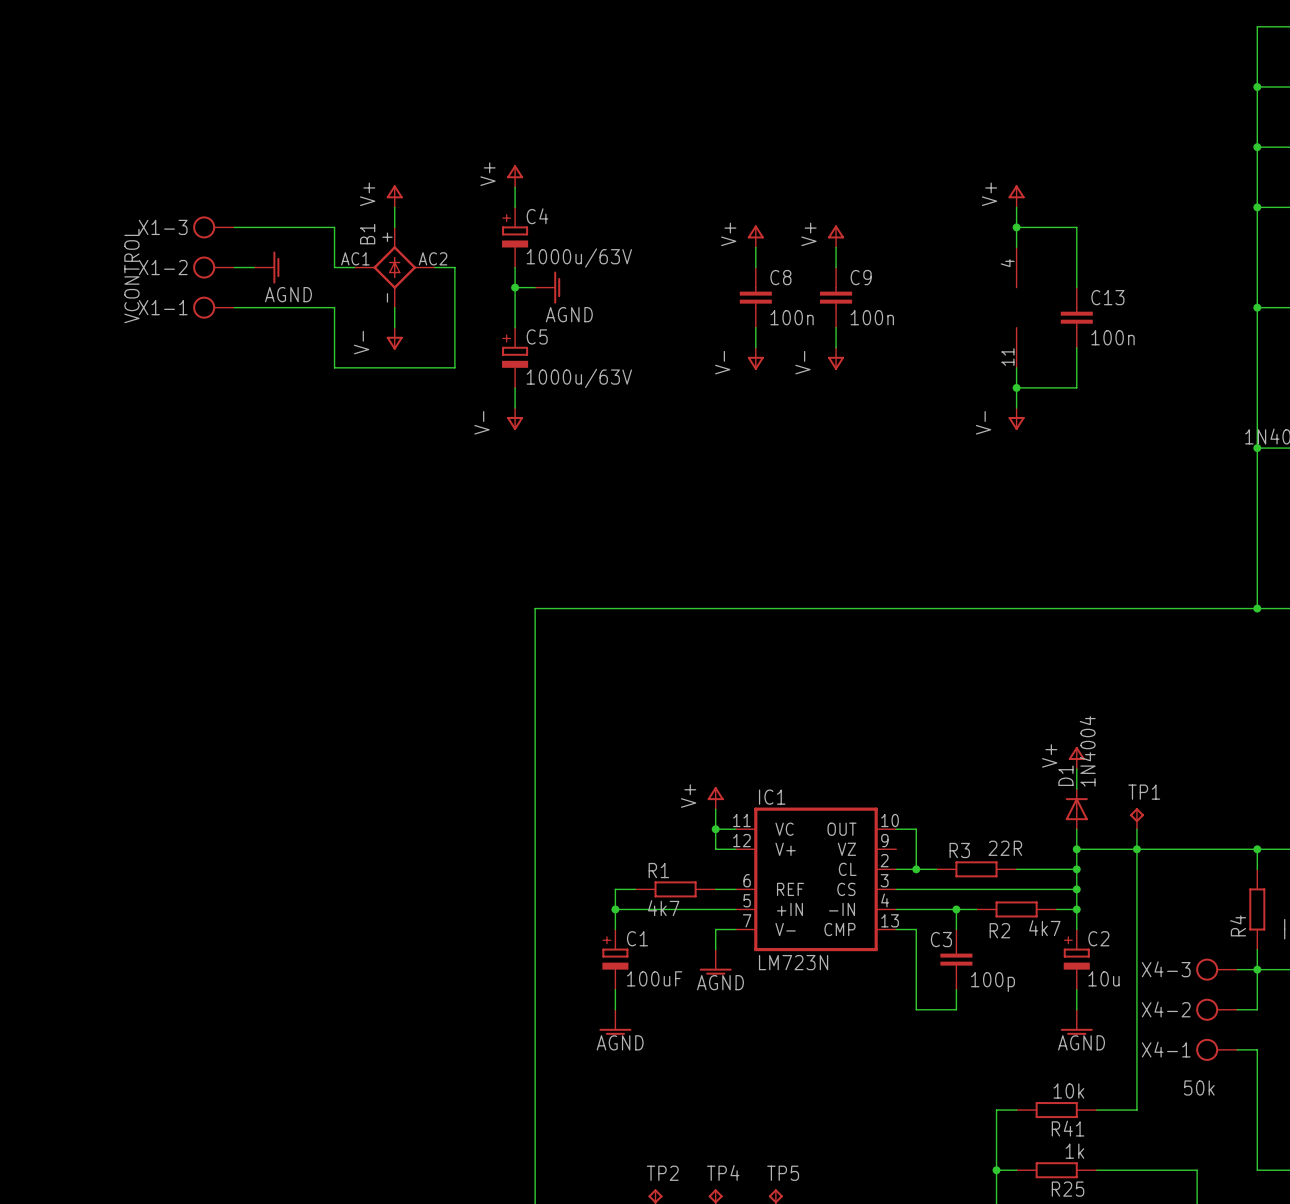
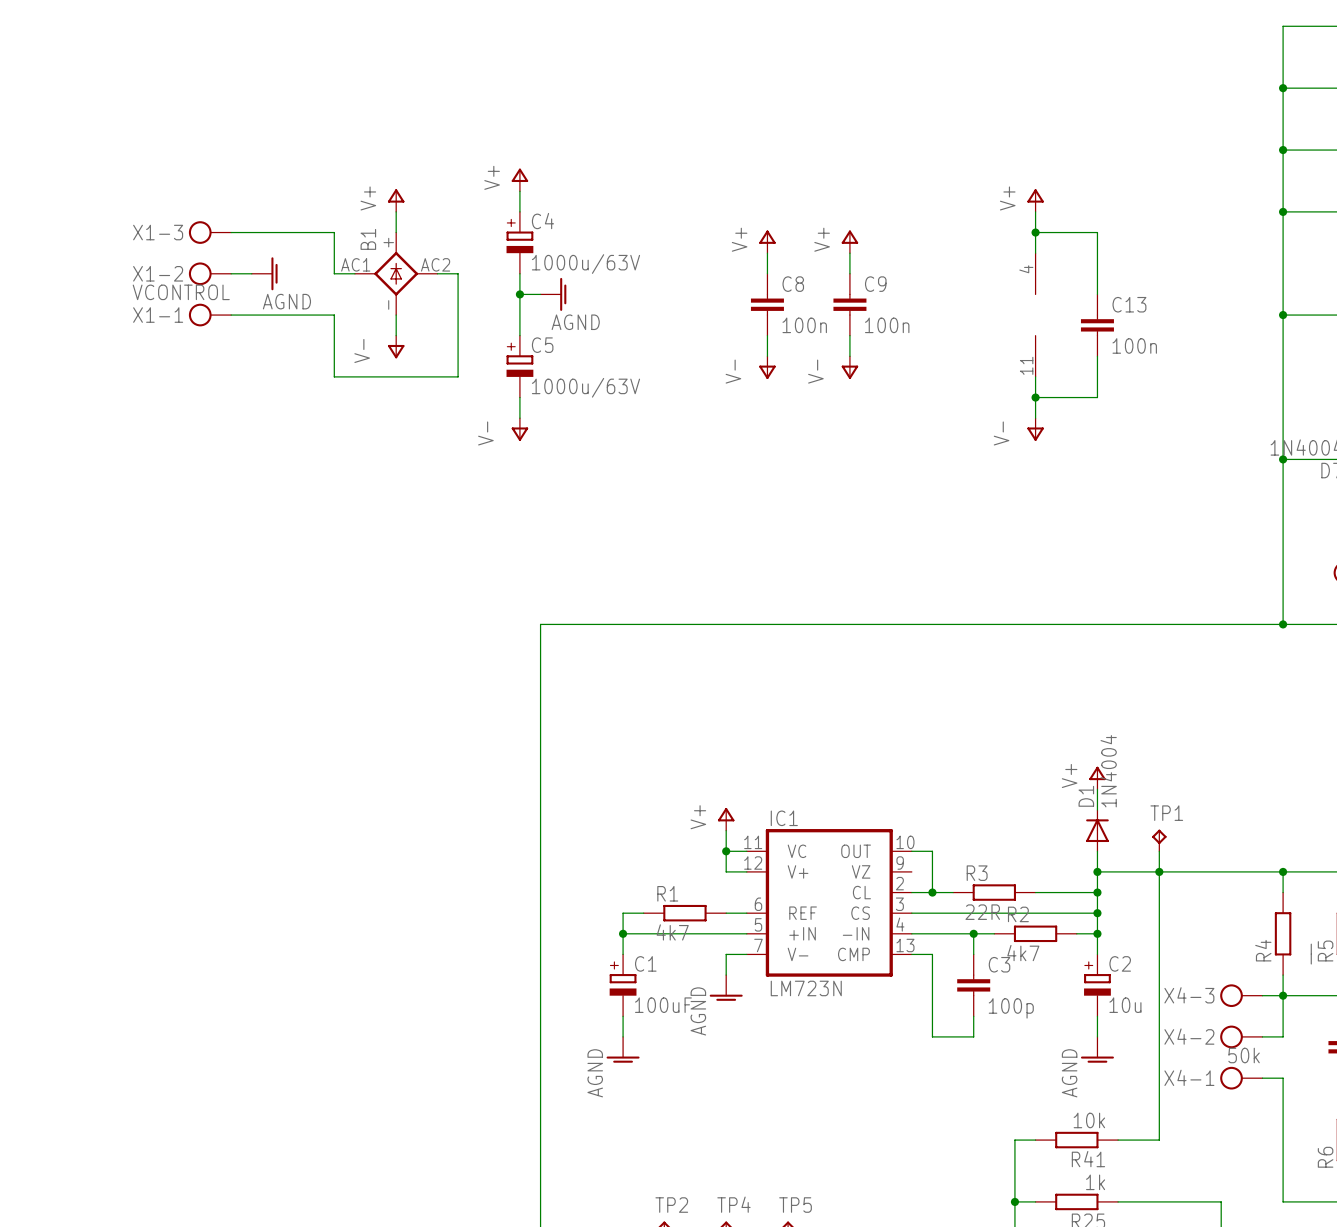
X1-1 value rotation: 0° (131, 276) -> 90° clockwise (181, 292)
R3 value position: 22R (1005, 848) -> 22R (982, 912)
R2 value position: 4k7 (1044, 928) -> 4k7 (1023, 953)
R2 name position: R2 (999, 930) -> R2 (1018, 914)
C3 name position: C3 (941, 939) -> C3 (999, 964)
power symbol text rotation: 0° (720, 982) -> 90° counterclockwise (698, 1011)
power symbol text rotation: 0° (620, 1042) -> 90° counterclockwise (595, 1073)
power symbol text rotation: 0° (1081, 1042) -> 90° counterclockwise (1069, 1073)
X4-1 value position: 50k (1199, 1087) -> 50k (1244, 1055)

